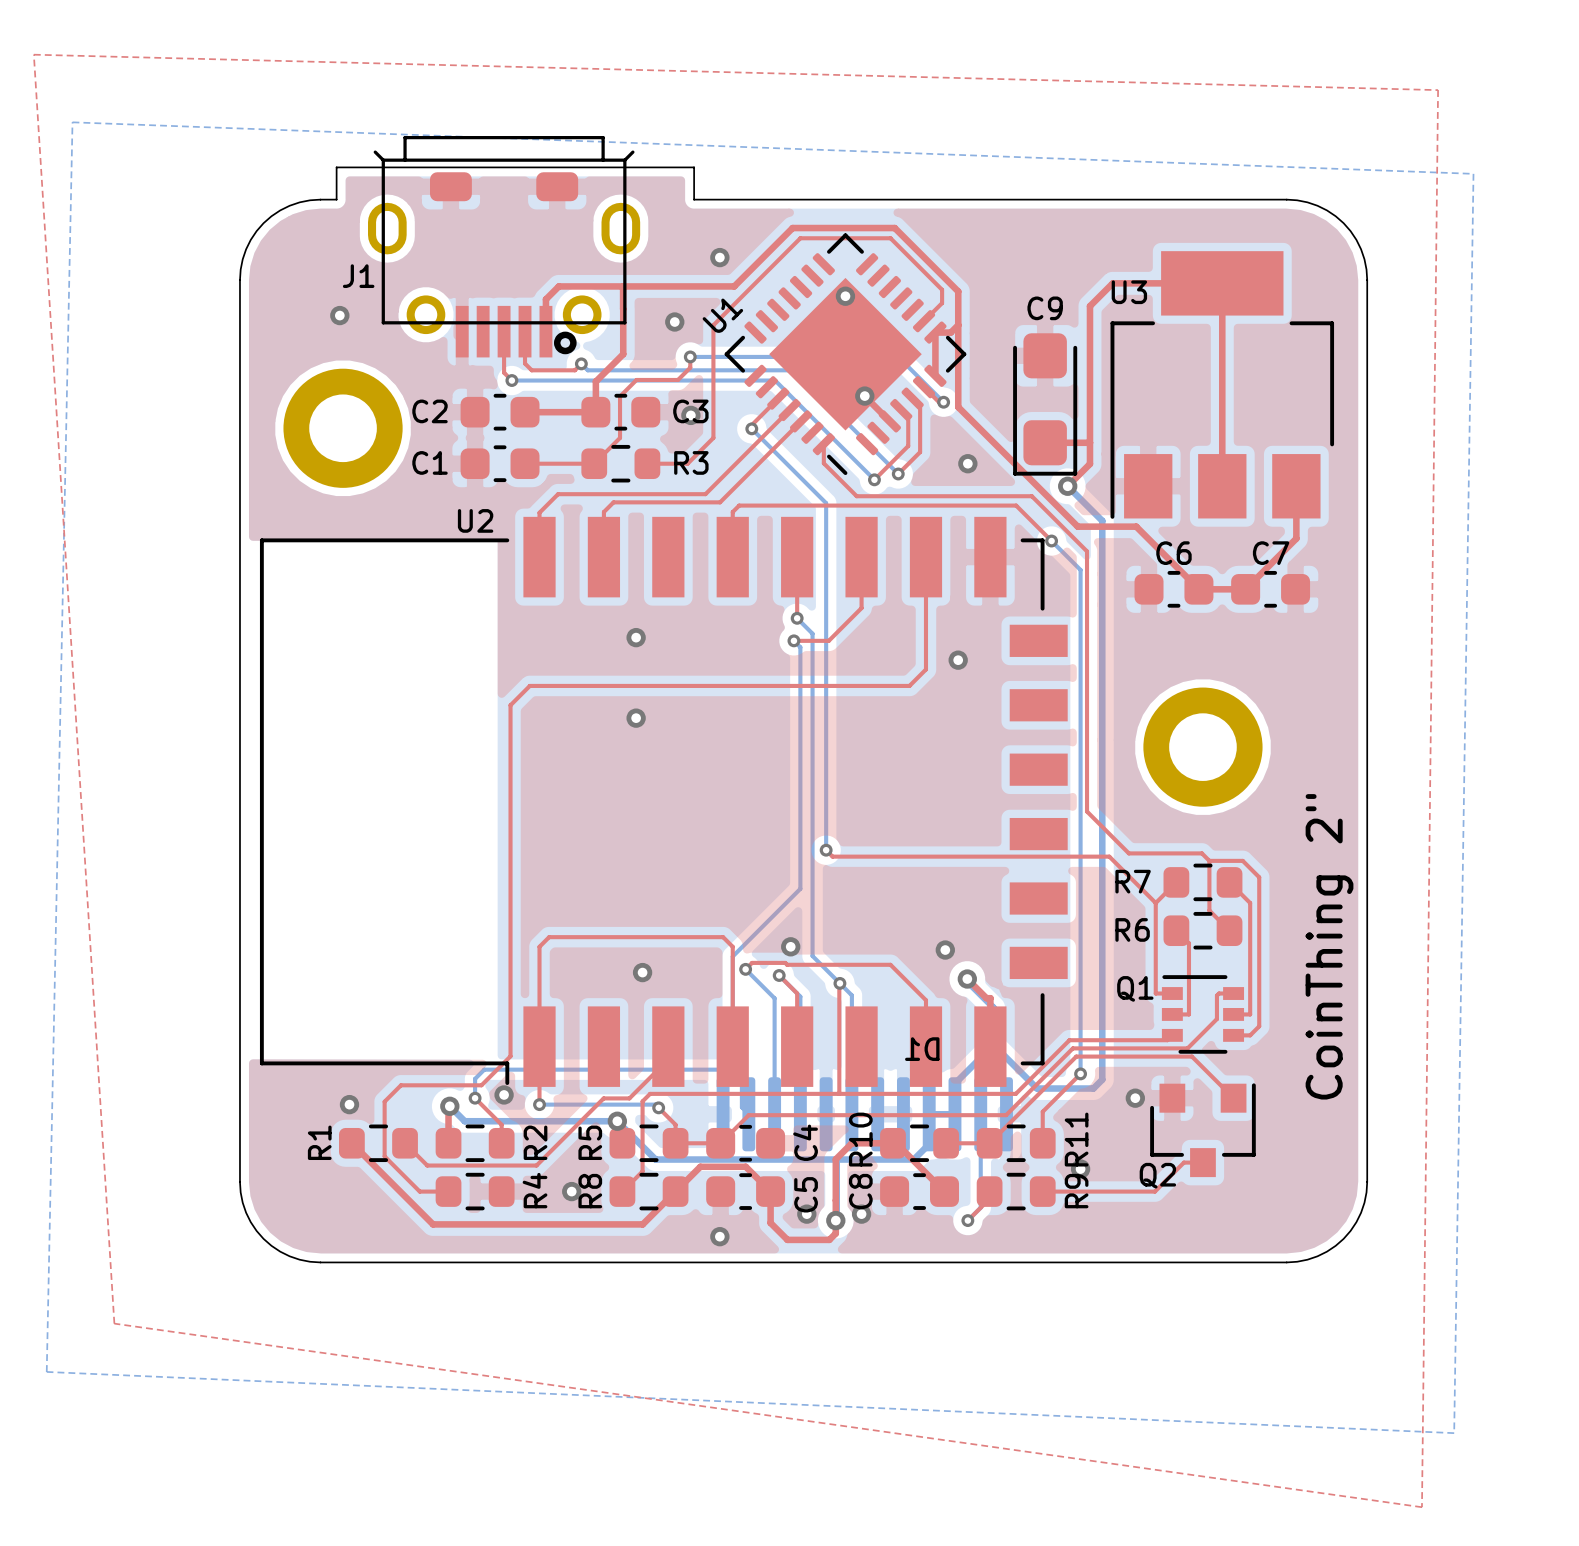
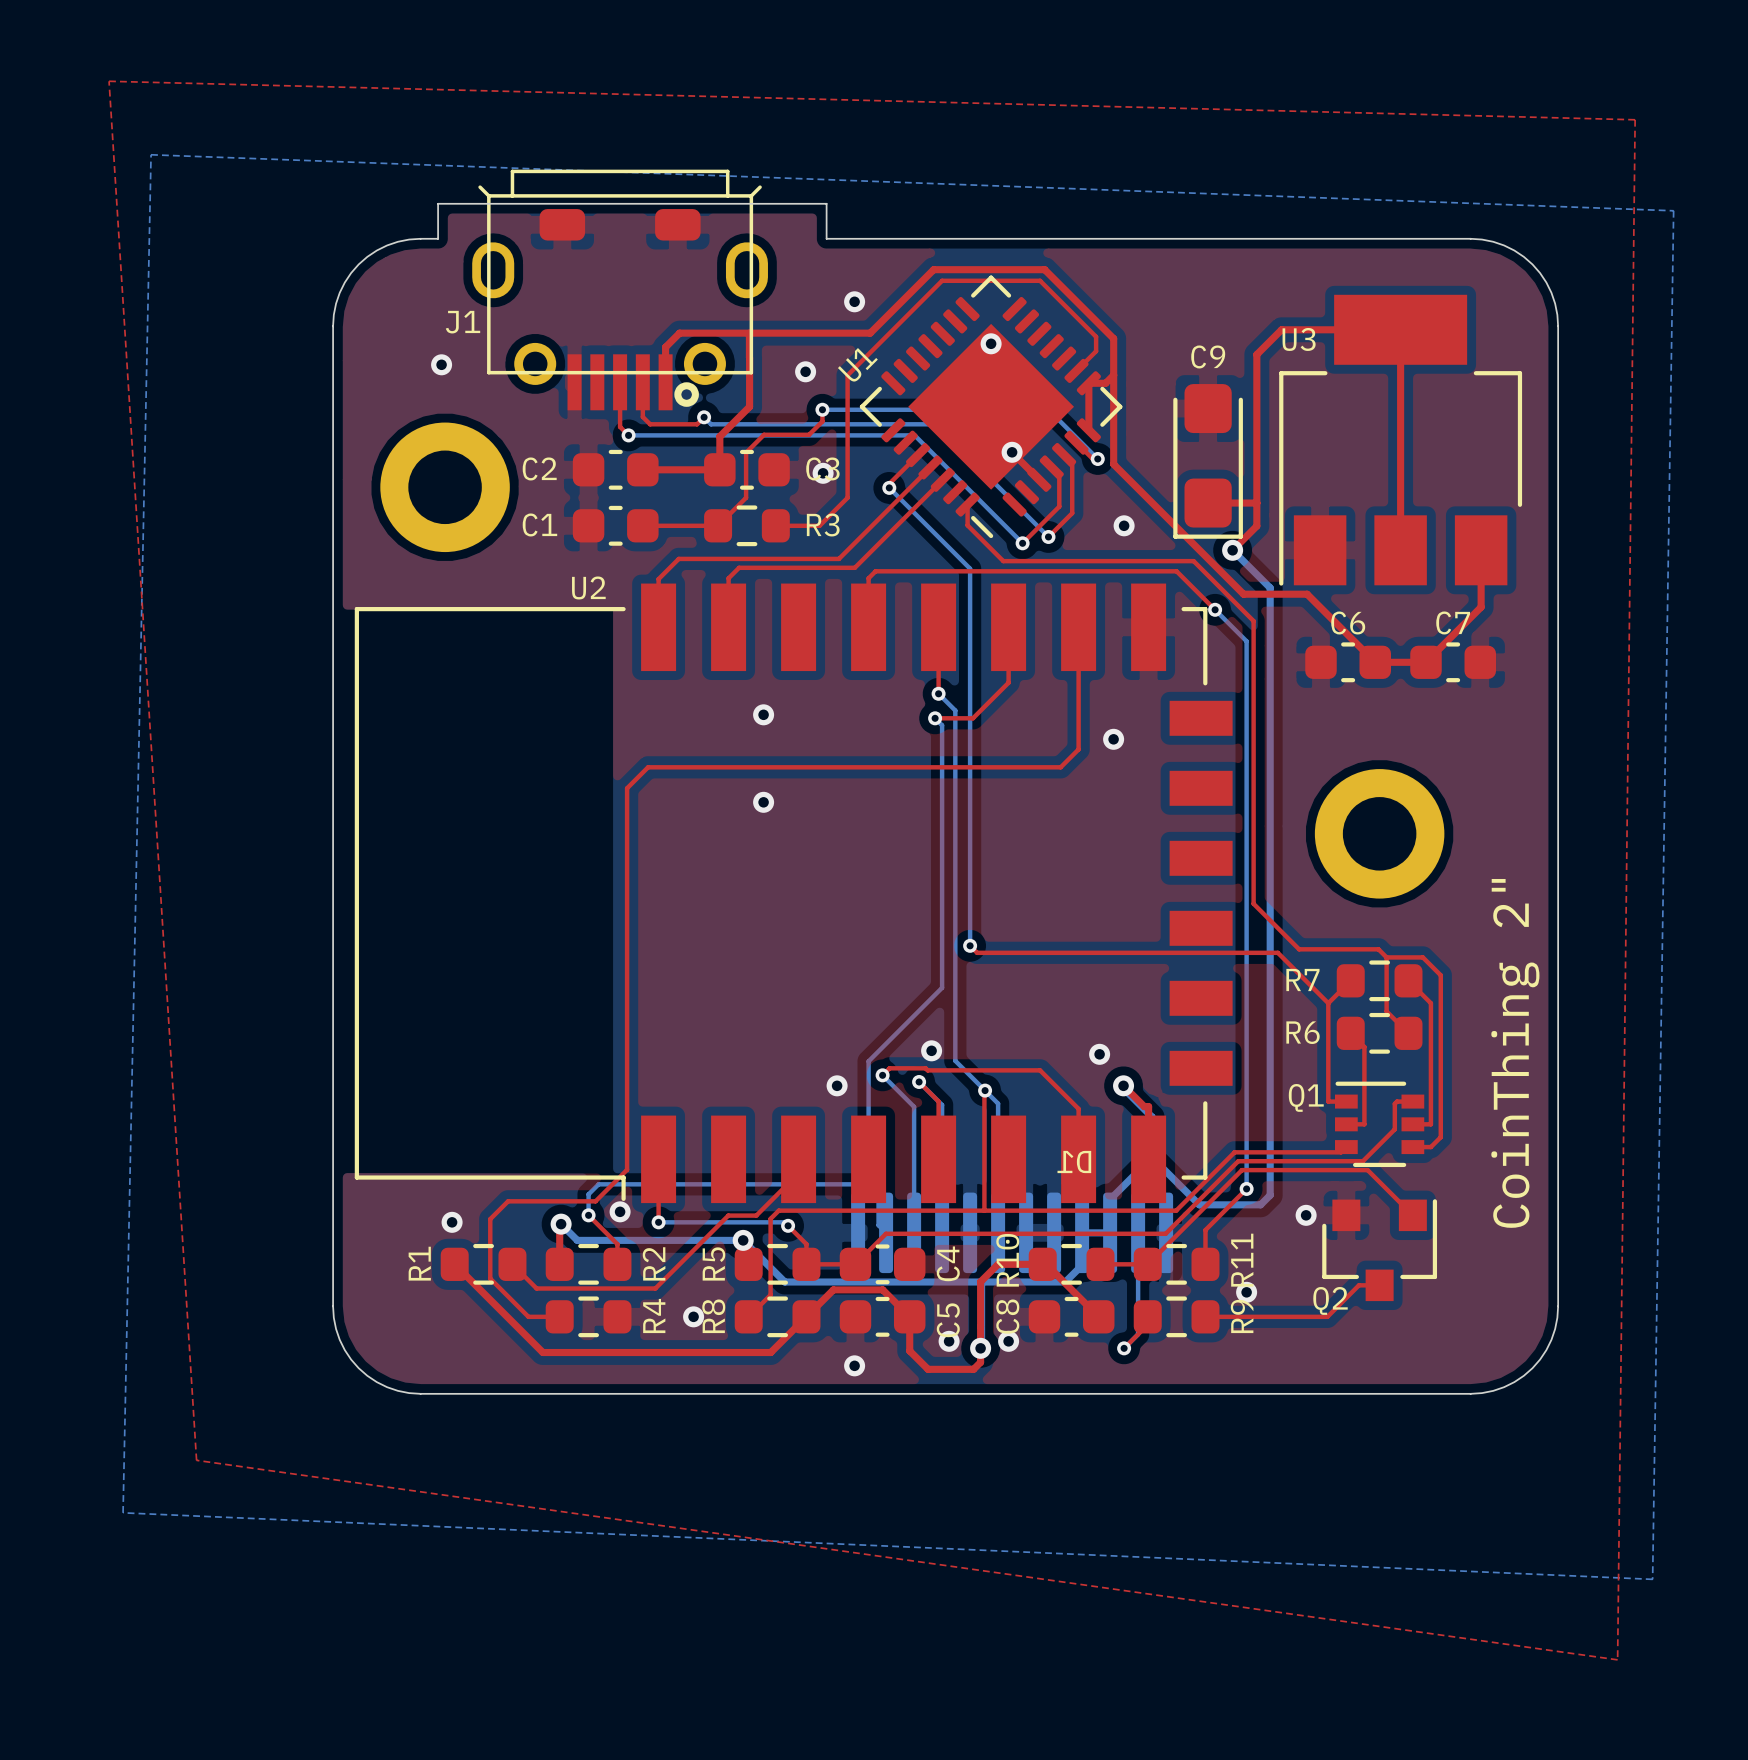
via position: (642, 972) -> (837, 1085)
top track: (539, 1046) (539, 946) (549, 937) (723, 937) (732, 946) (732, 1046) -> none

